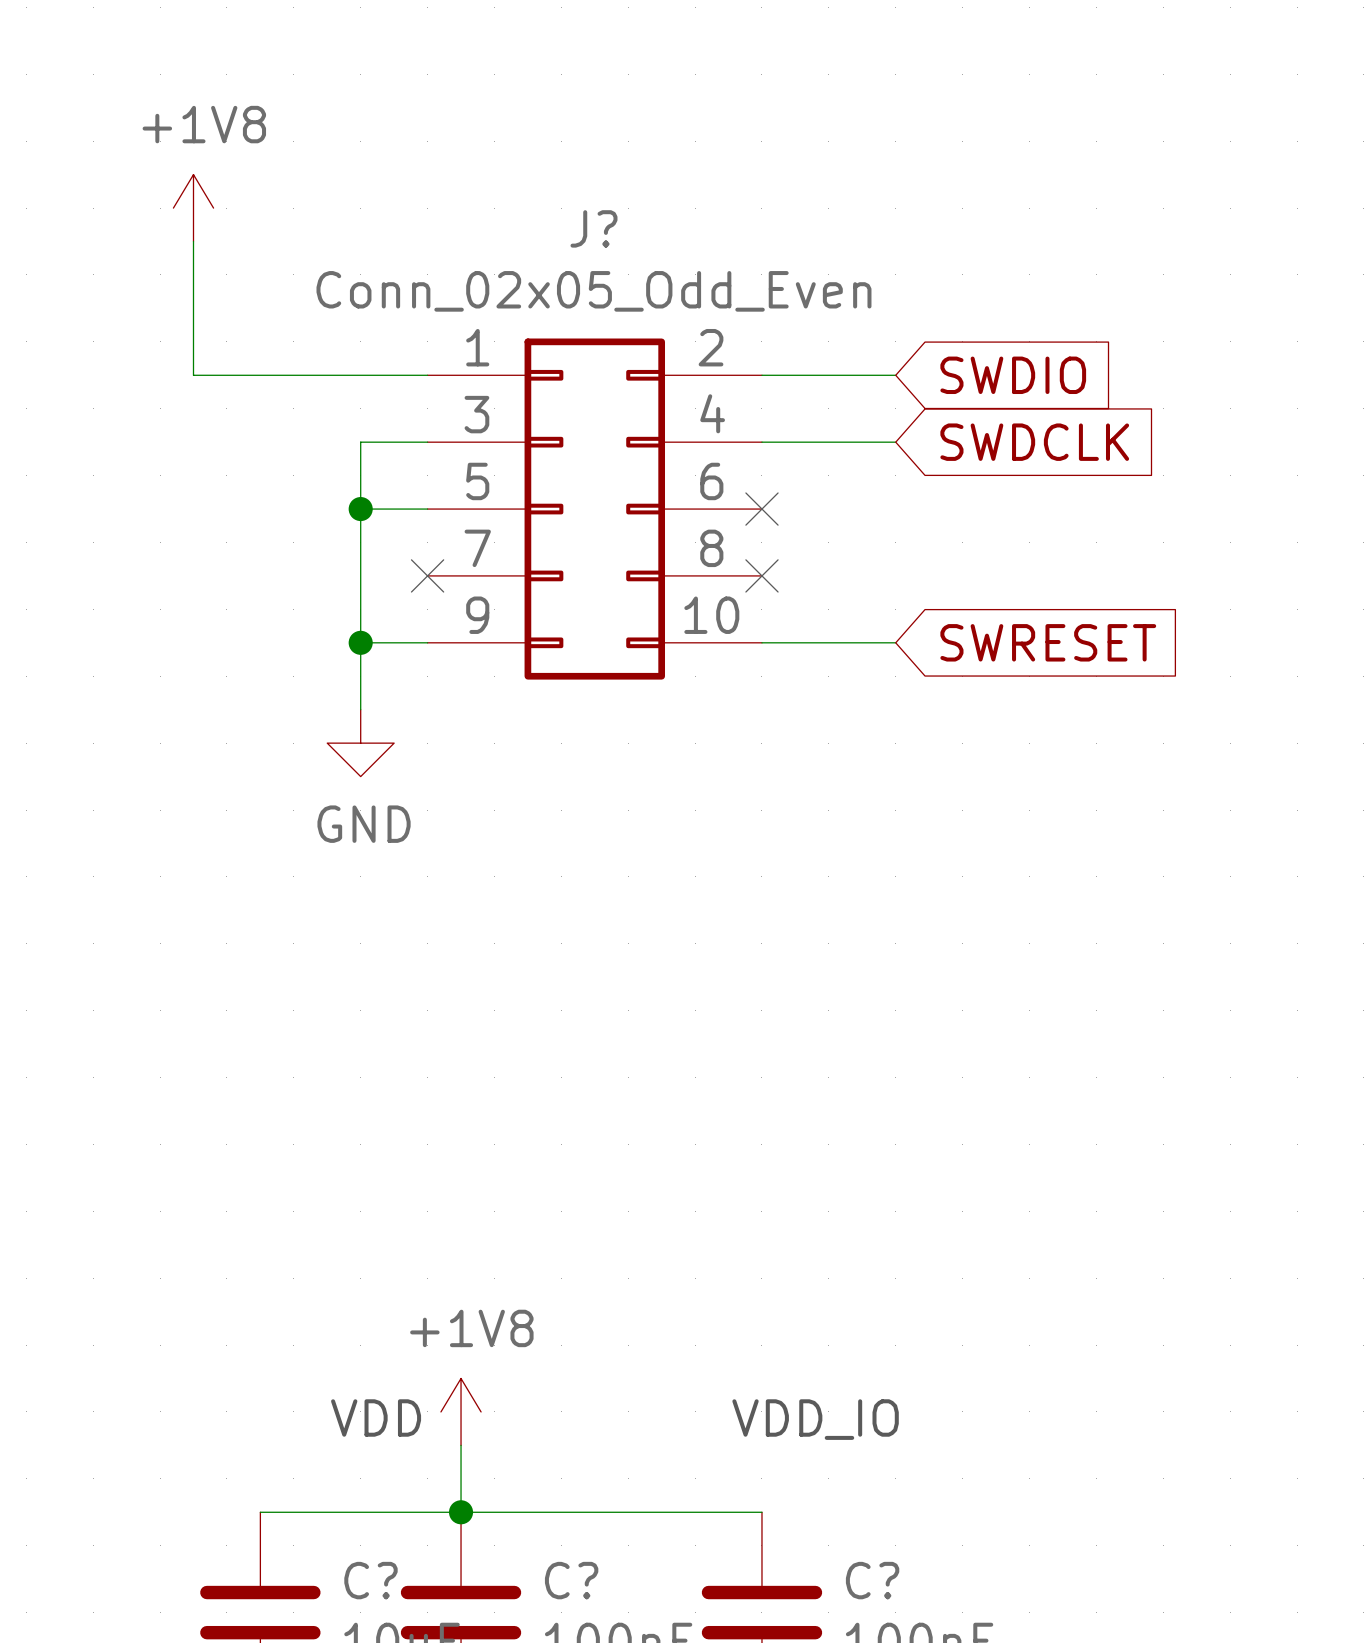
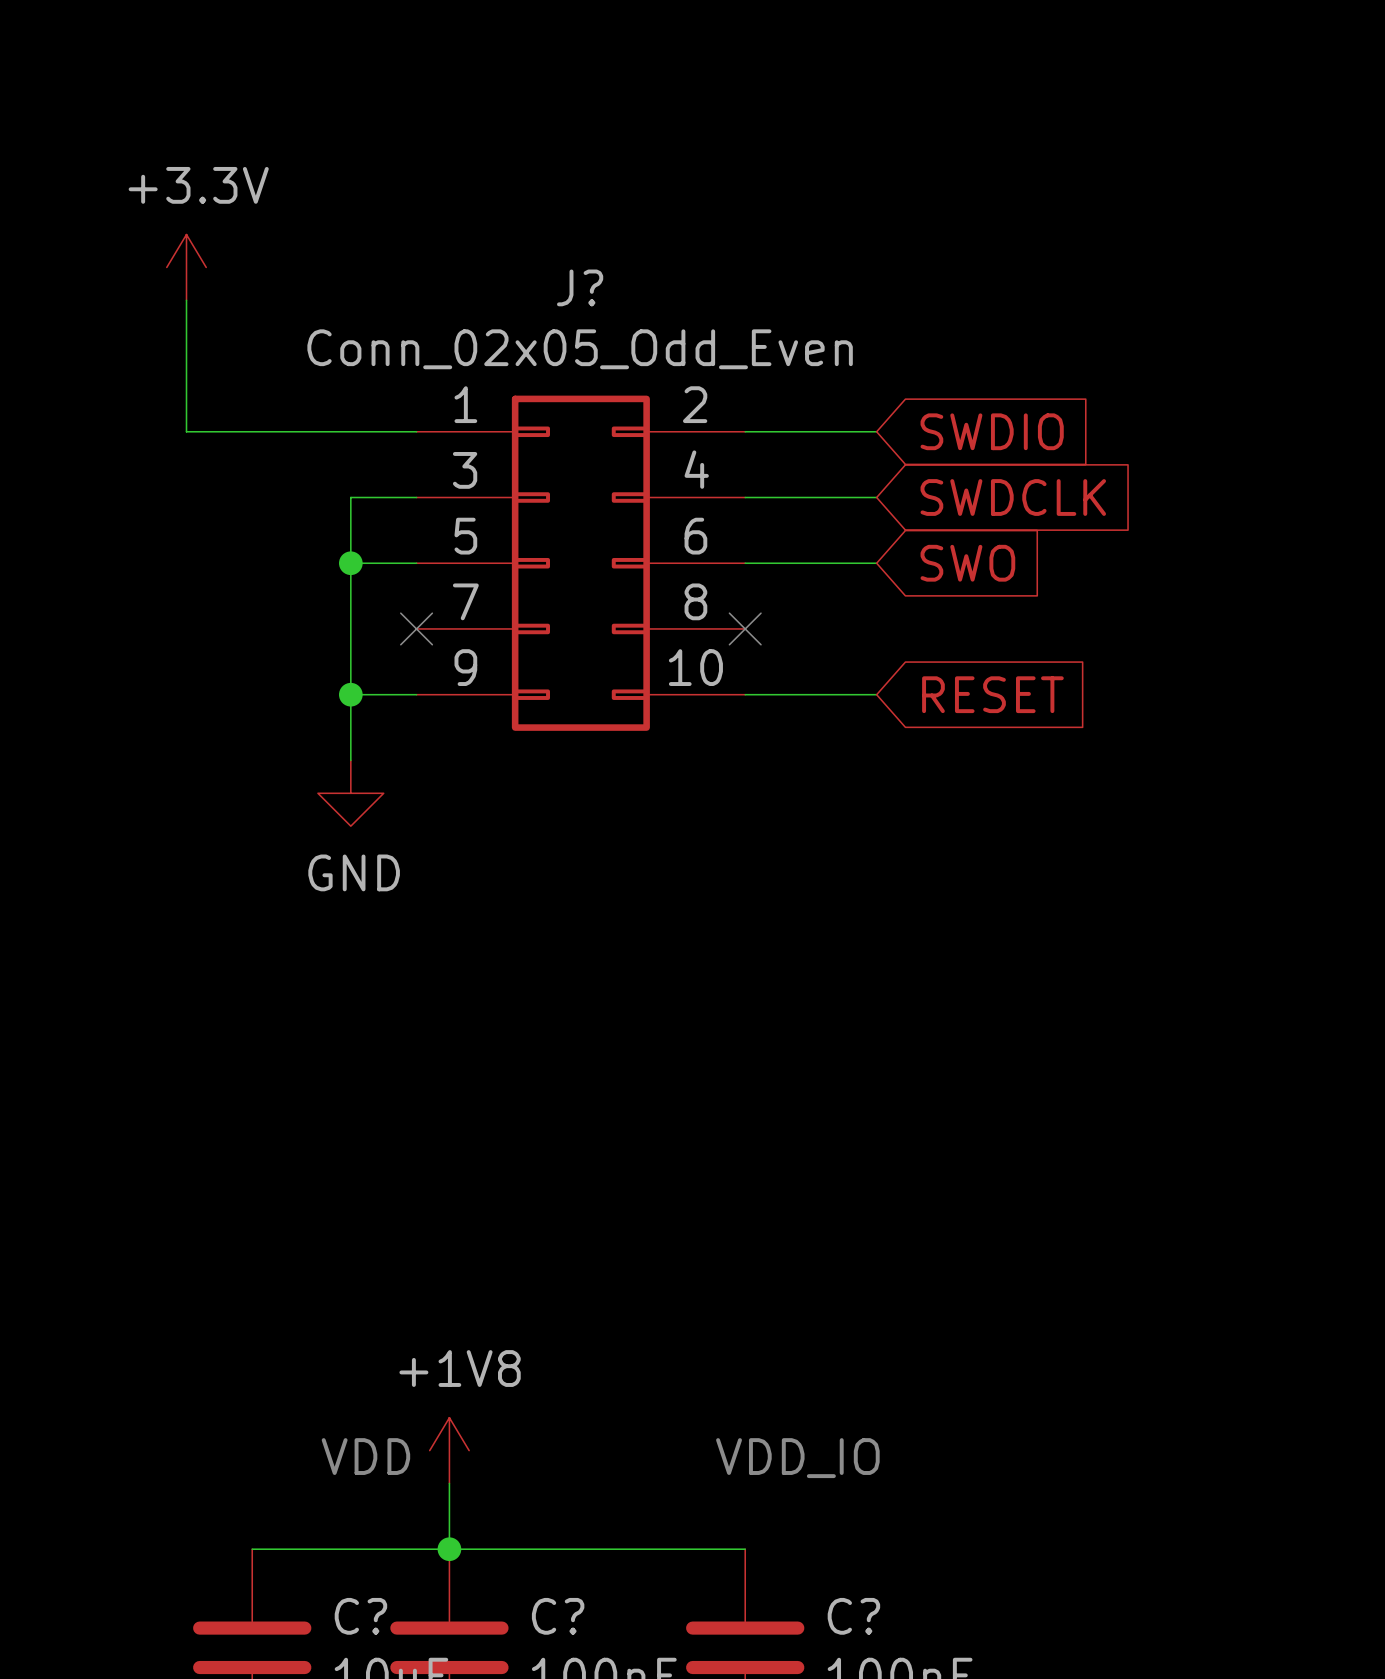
power symbol: +1V8 (193, 208) -> +3.3V (186, 267)
wire: none -> (745, 563) (876, 563)
no-connect mark: (761, 509) -> none
global label: none -> SWO (967, 563)
global label: SWRESET (1048, 642) -> RESET (992, 694)

